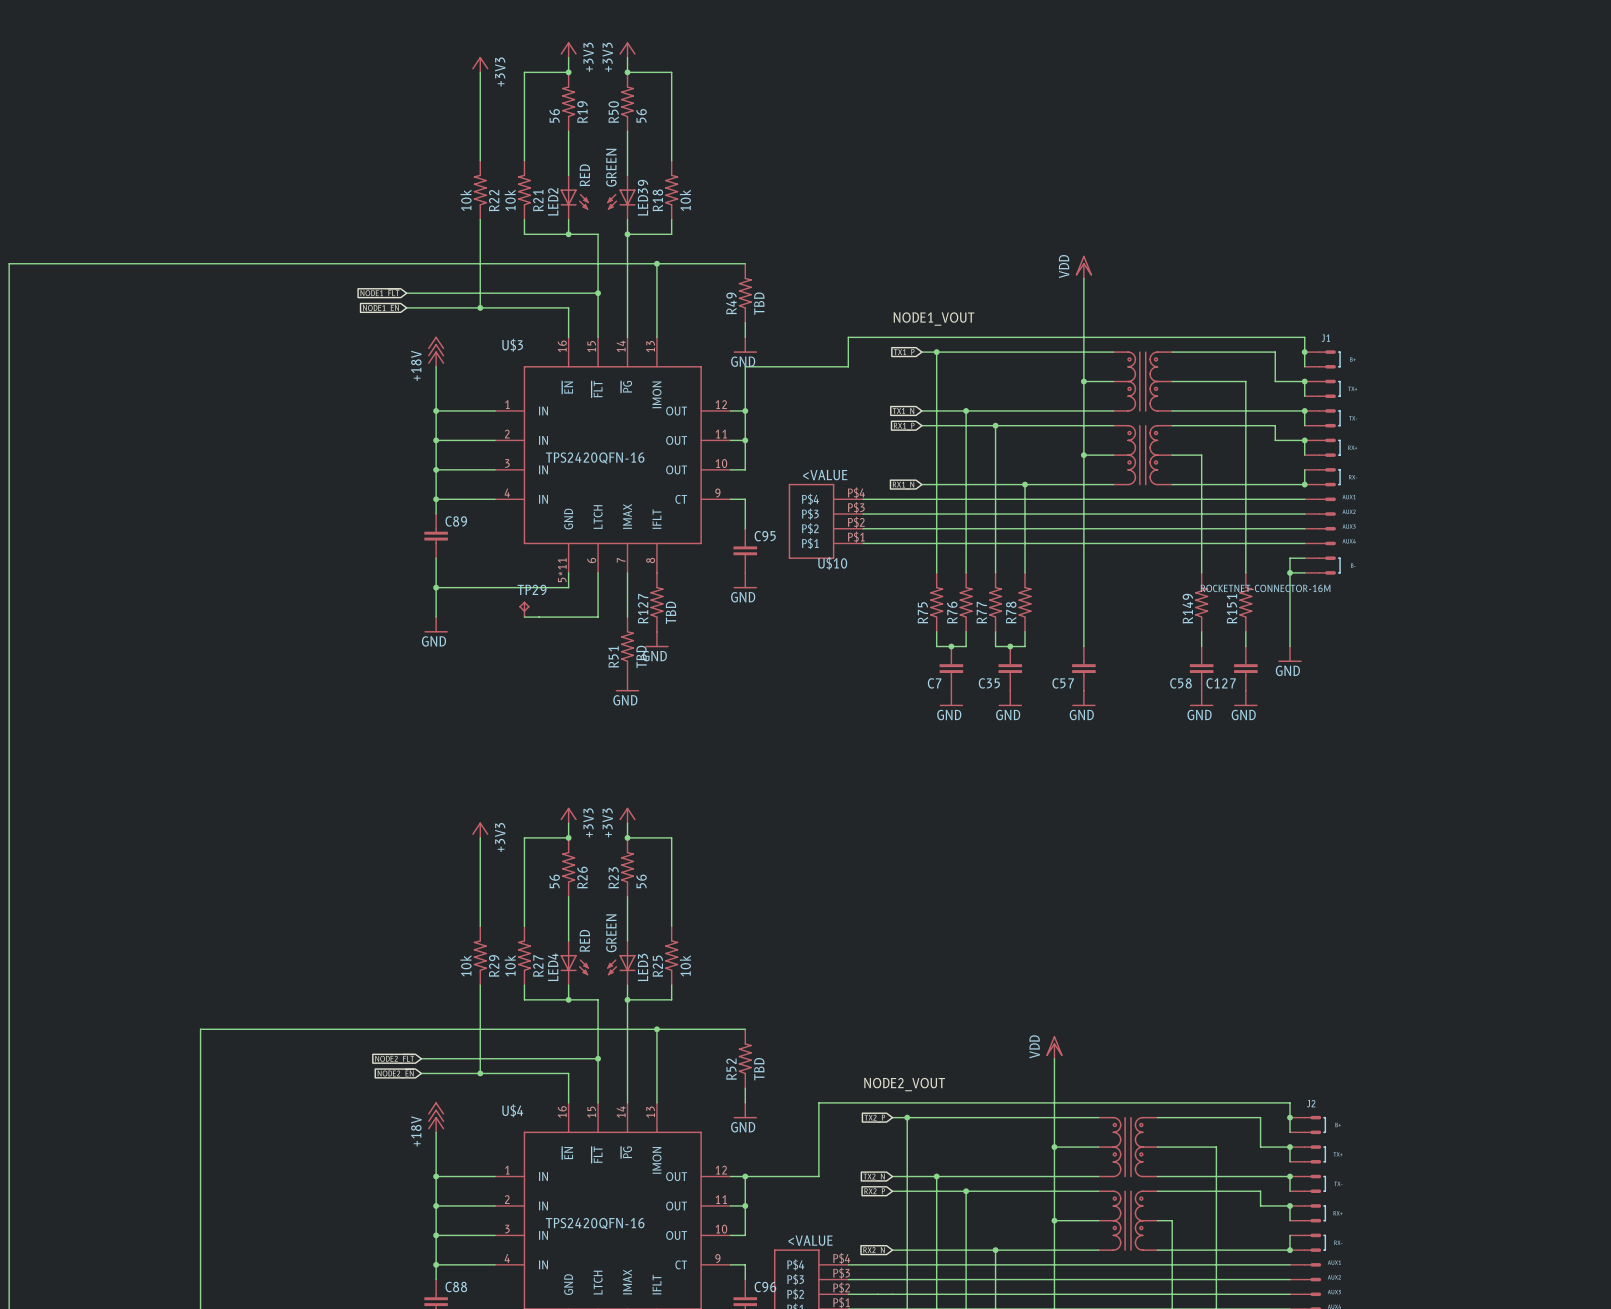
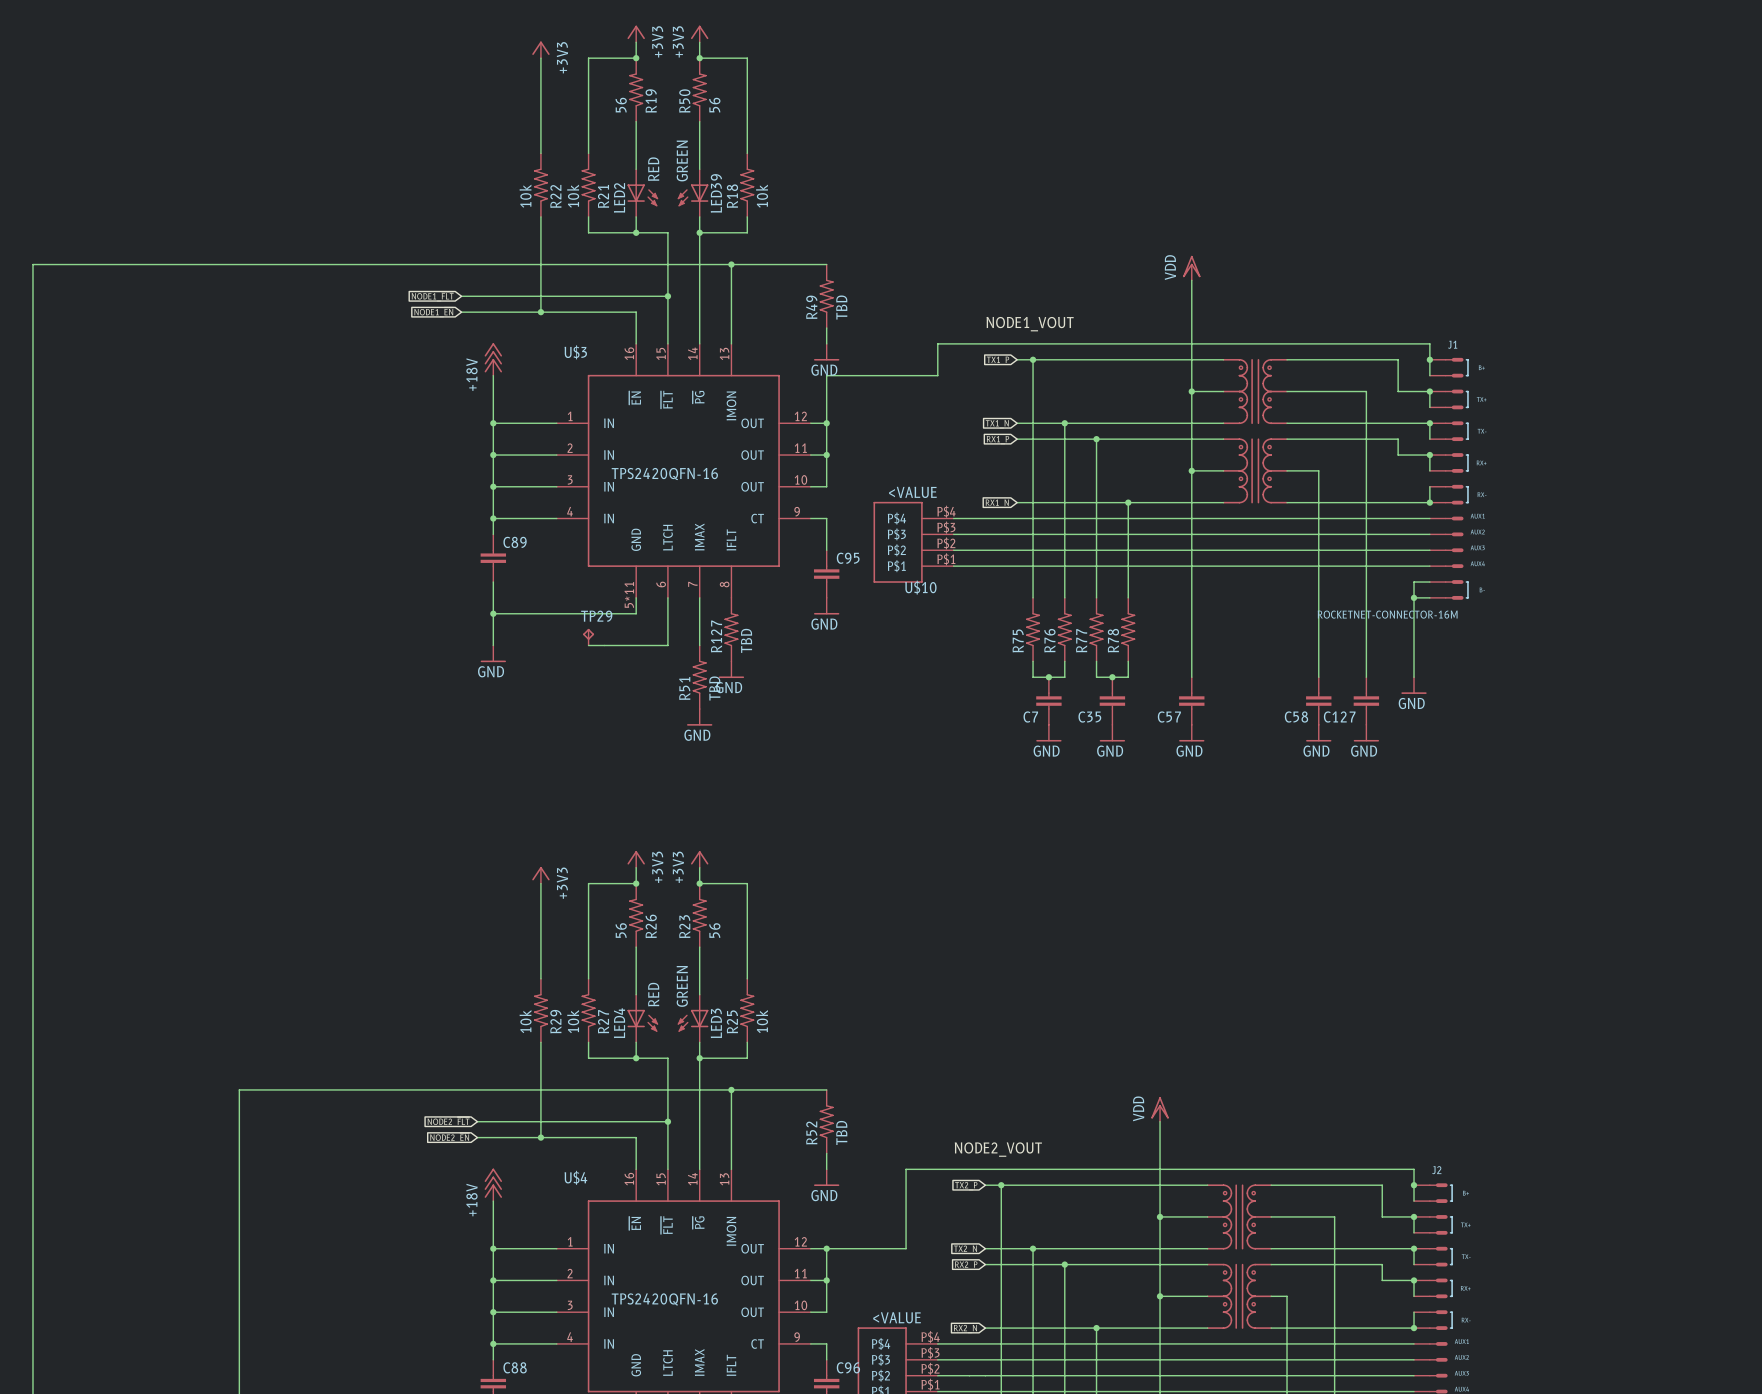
R149: (1201, 602) -> none
R151: (1245, 602) -> none

